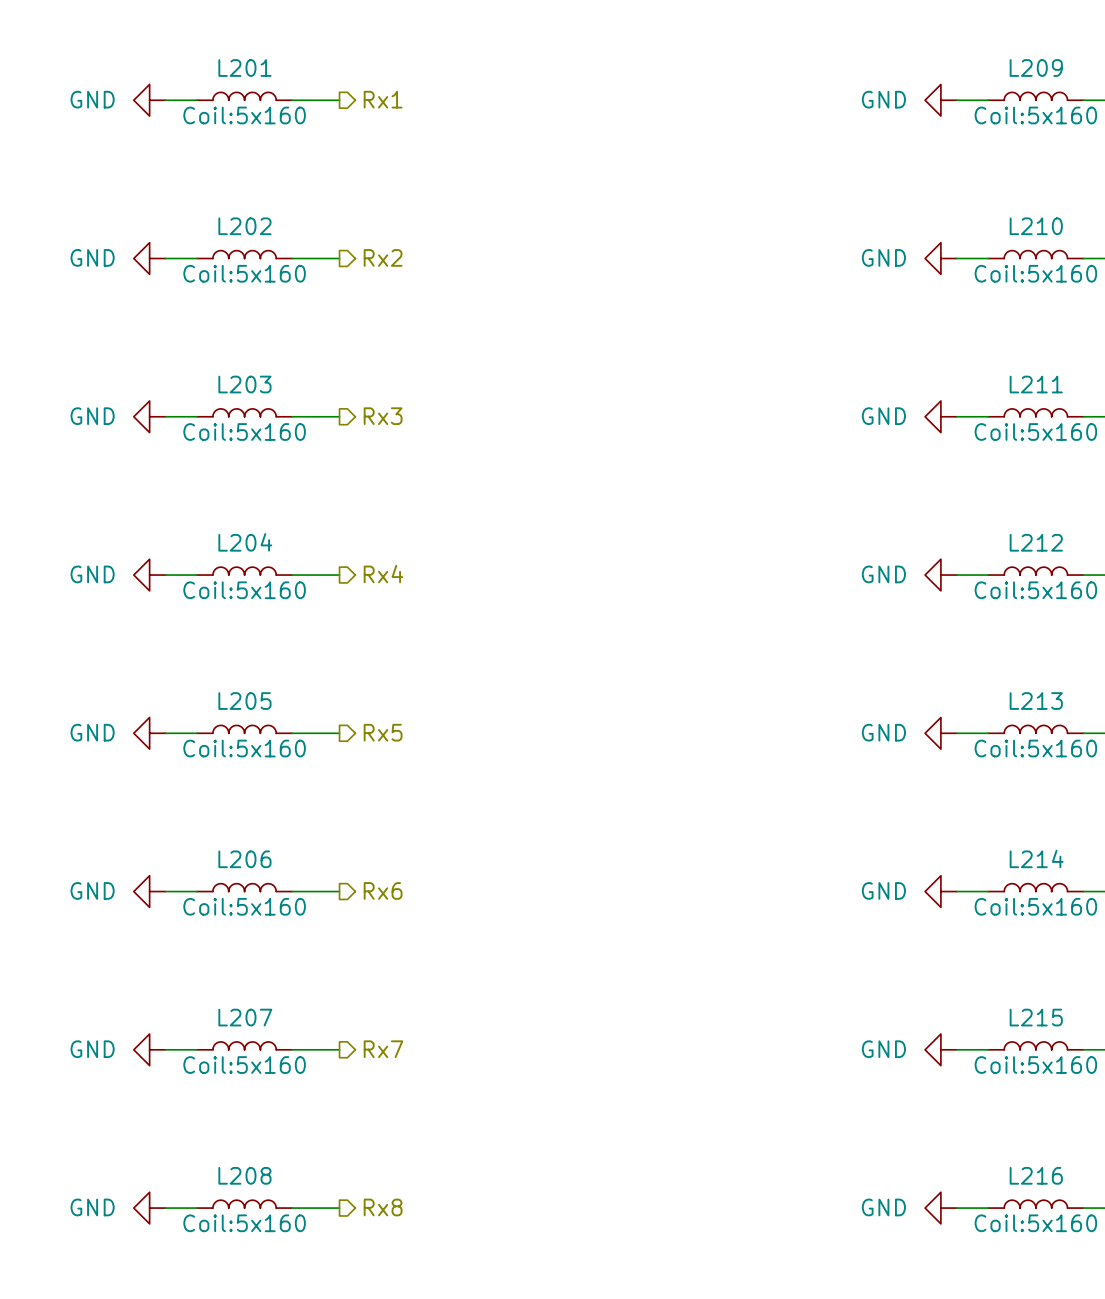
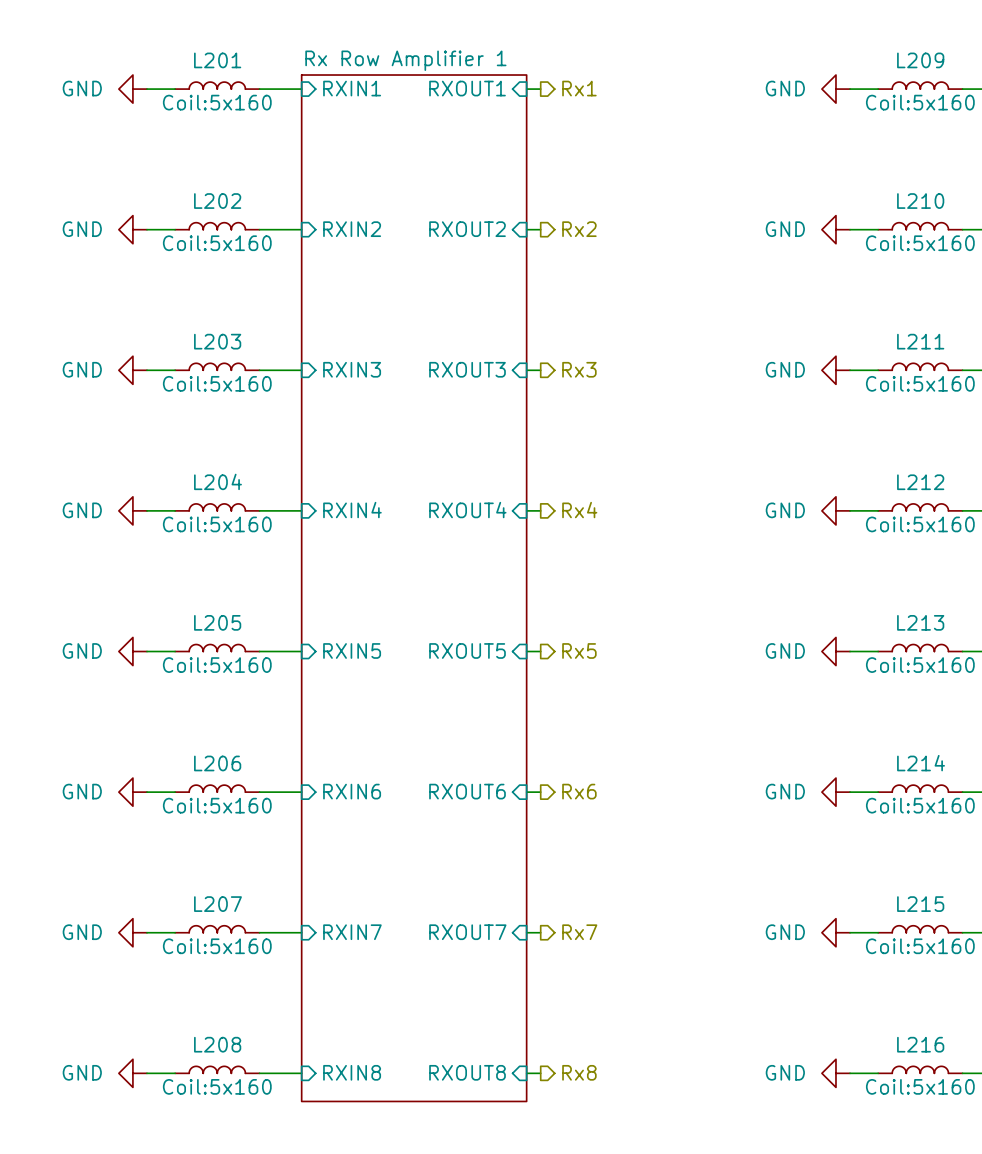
hierarchical label position: Rx1 (383, 99) -> Rx1 (579, 88)
sheet pin: none -> RXIN1 (352, 88)
sheet pin: none -> RXOUT1 (467, 88)
wire: none -> (526, 89) (540, 89)
hierarchical label position: Rx2 (383, 257) -> Rx2 (579, 229)
sheet pin: none -> RXIN2 (352, 229)
sheet pin: none -> RXOUT2 (467, 229)
wire: none -> (526, 229) (540, 229)
hierarchical label position: Rx3 (383, 416) -> Rx3 (579, 369)
sheet pin: none -> RXIN3 (352, 369)
sheet pin: none -> RXOUT3 (467, 369)
wire: none -> (526, 370) (540, 370)
hierarchical label position: Rx4 (383, 574) -> Rx4 (579, 510)
sheet pin: none -> RXIN4 (352, 510)
sheet pin: none -> RXOUT4 (467, 510)
wire: none -> (526, 510) (540, 510)
sheet Rx Row Amplifier 1: none -> (414, 588)
hierarchical label position: Rx5 (383, 732) -> Rx5 (579, 650)
sheet pin: none -> RXIN5 (352, 650)
sheet pin: none -> RXOUT5 (467, 650)
wire: none -> (526, 651) (540, 651)
hierarchical label position: Rx6 (383, 890) -> Rx6 (579, 791)
sheet pin: none -> RXIN6 (352, 791)
sheet pin: none -> RXOUT6 (467, 791)
wire: none -> (526, 792) (540, 792)
hierarchical label position: Rx7 (383, 1049) -> Rx7 (579, 932)
sheet pin: none -> RXIN7 (352, 932)
sheet pin: none -> RXOUT7 (467, 932)
wire: none -> (526, 932) (540, 932)
hierarchical label position: Rx8 (383, 1207) -> Rx8 (579, 1072)
sheet pin: none -> RXIN8 (352, 1072)
sheet pin: none -> RXOUT8 (467, 1072)
wire: none -> (526, 1073) (540, 1073)

